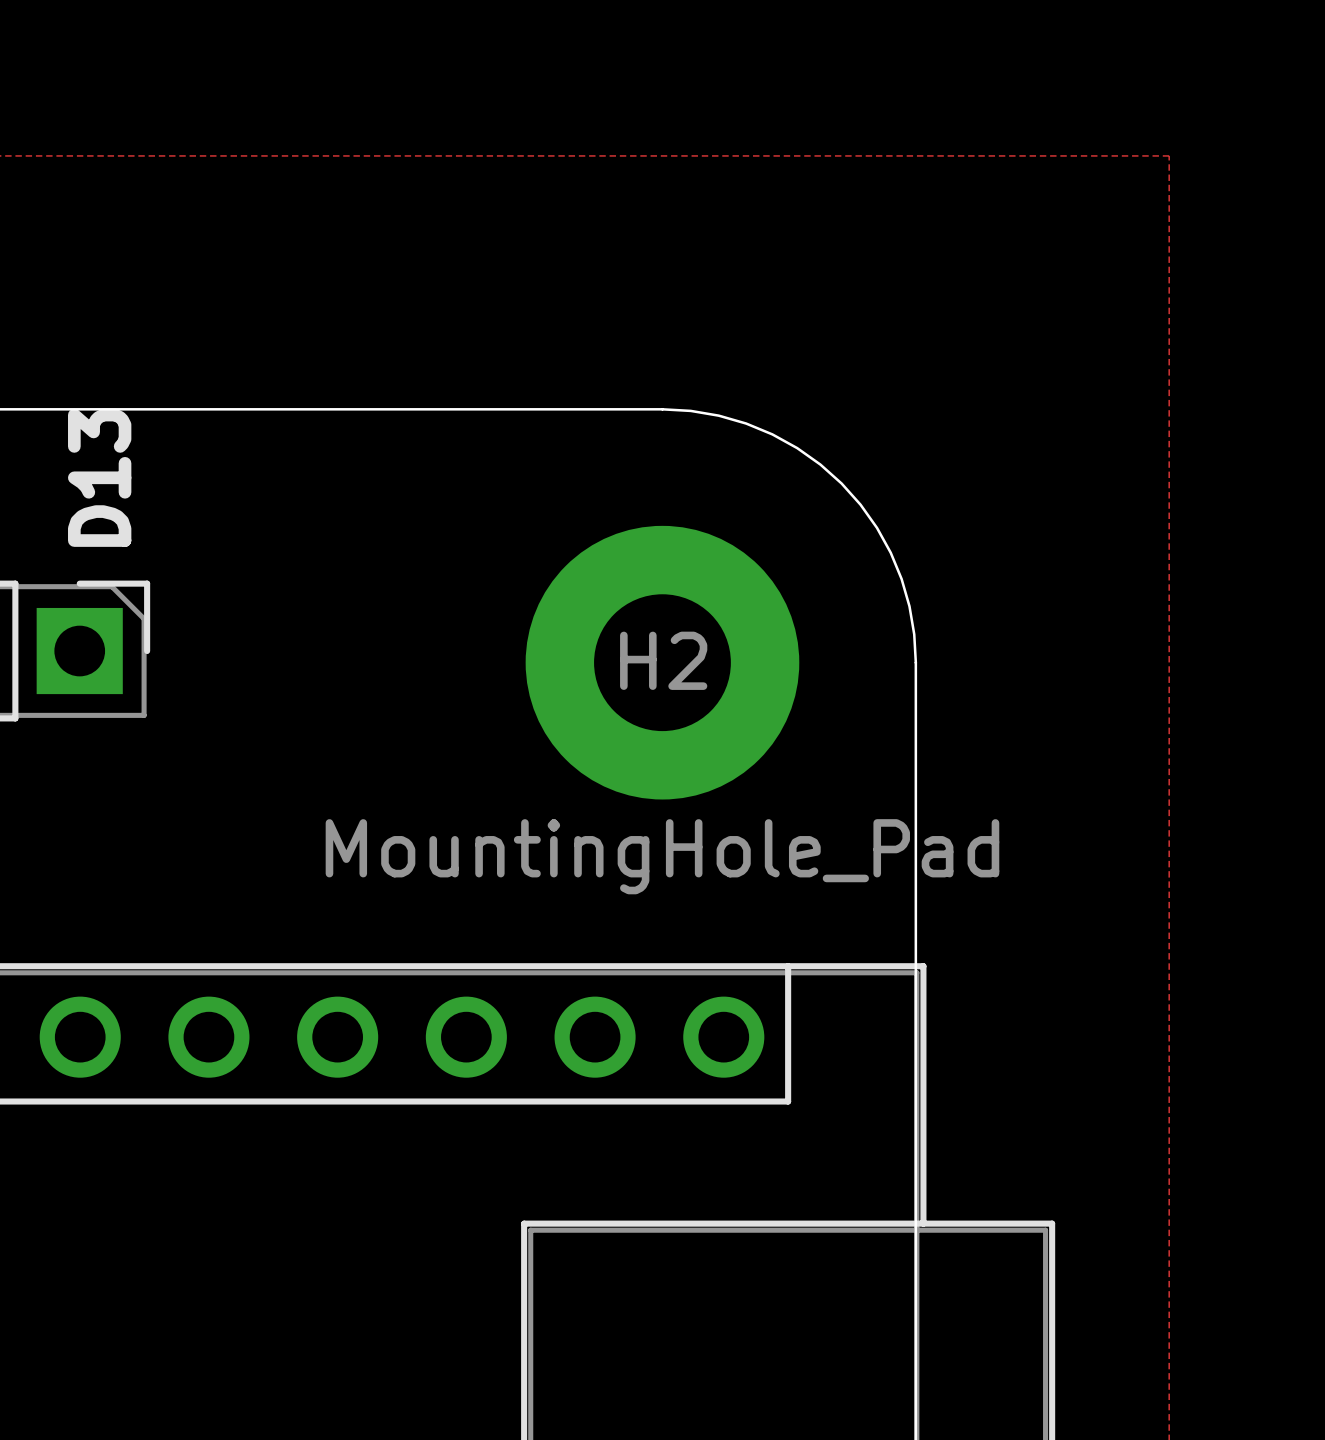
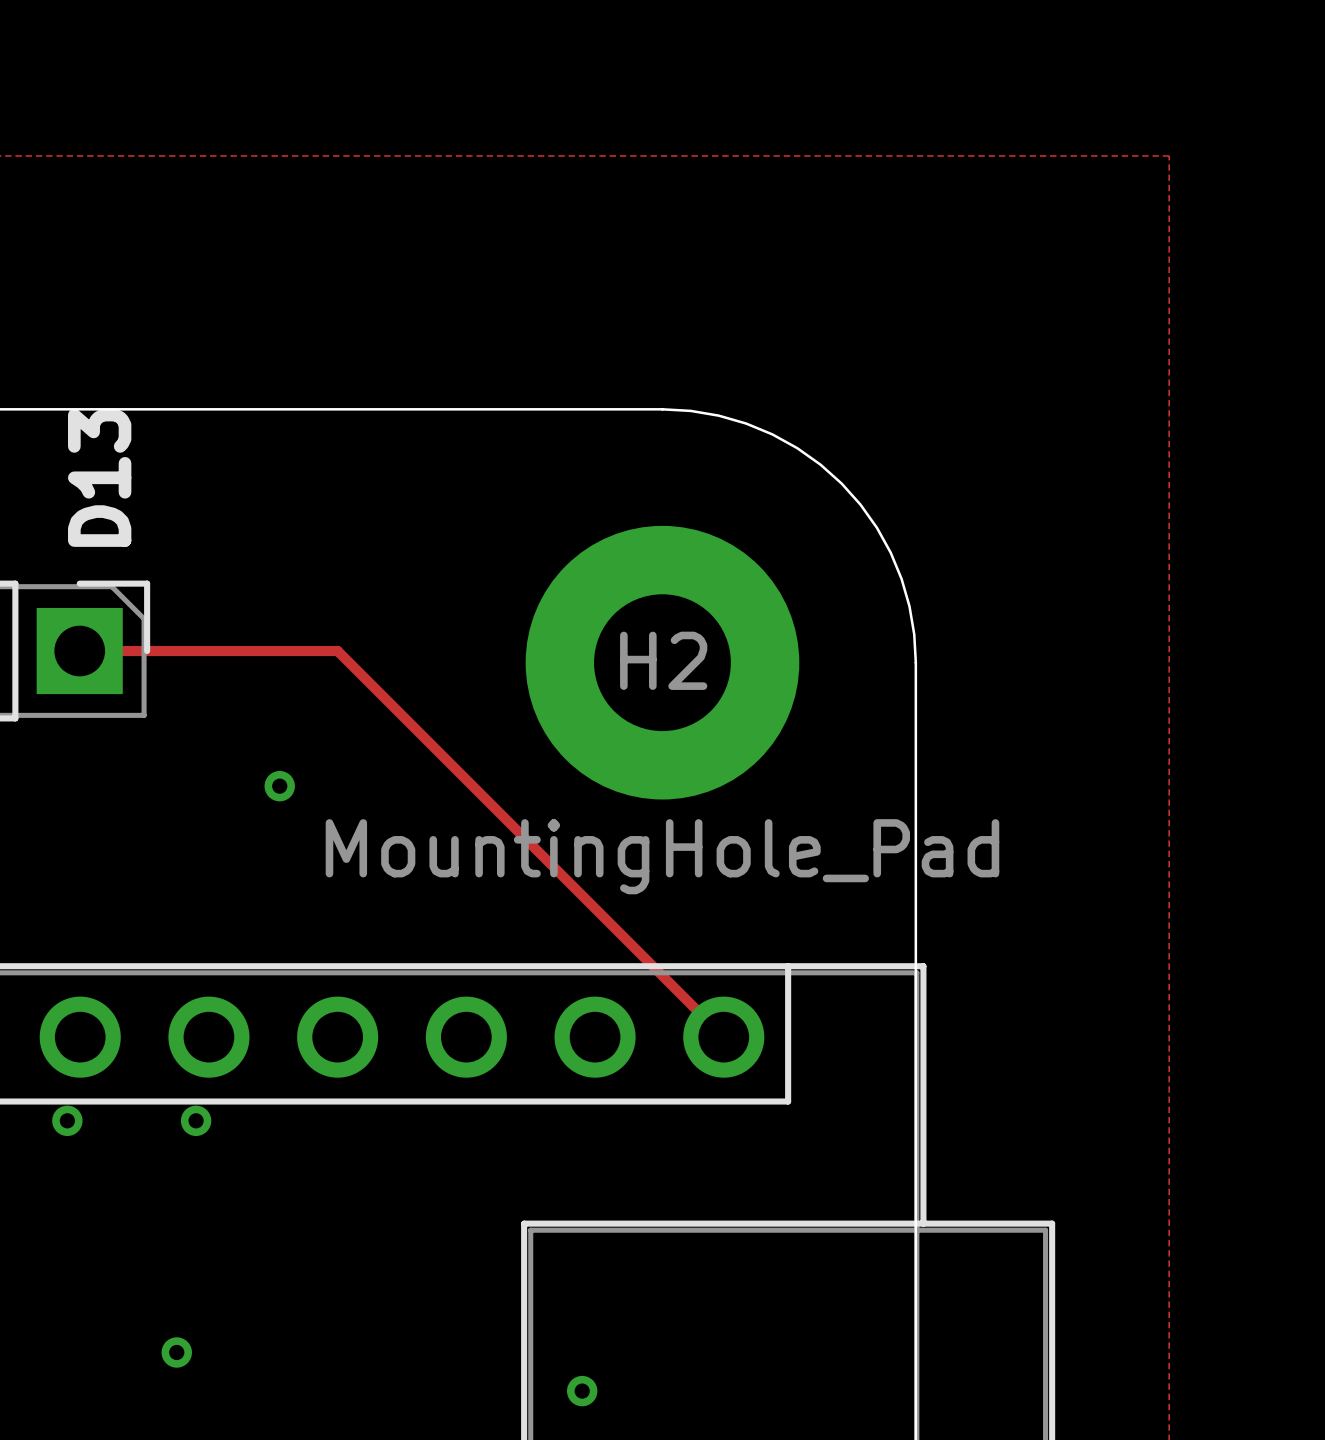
track: none -> (79, 651) (337, 651) (723, 1037)
via: none -> (279, 786)
via: none -> (67, 1120)
via: none -> (196, 1120)
via: none -> (176, 1352)
via: none -> (582, 1391)

